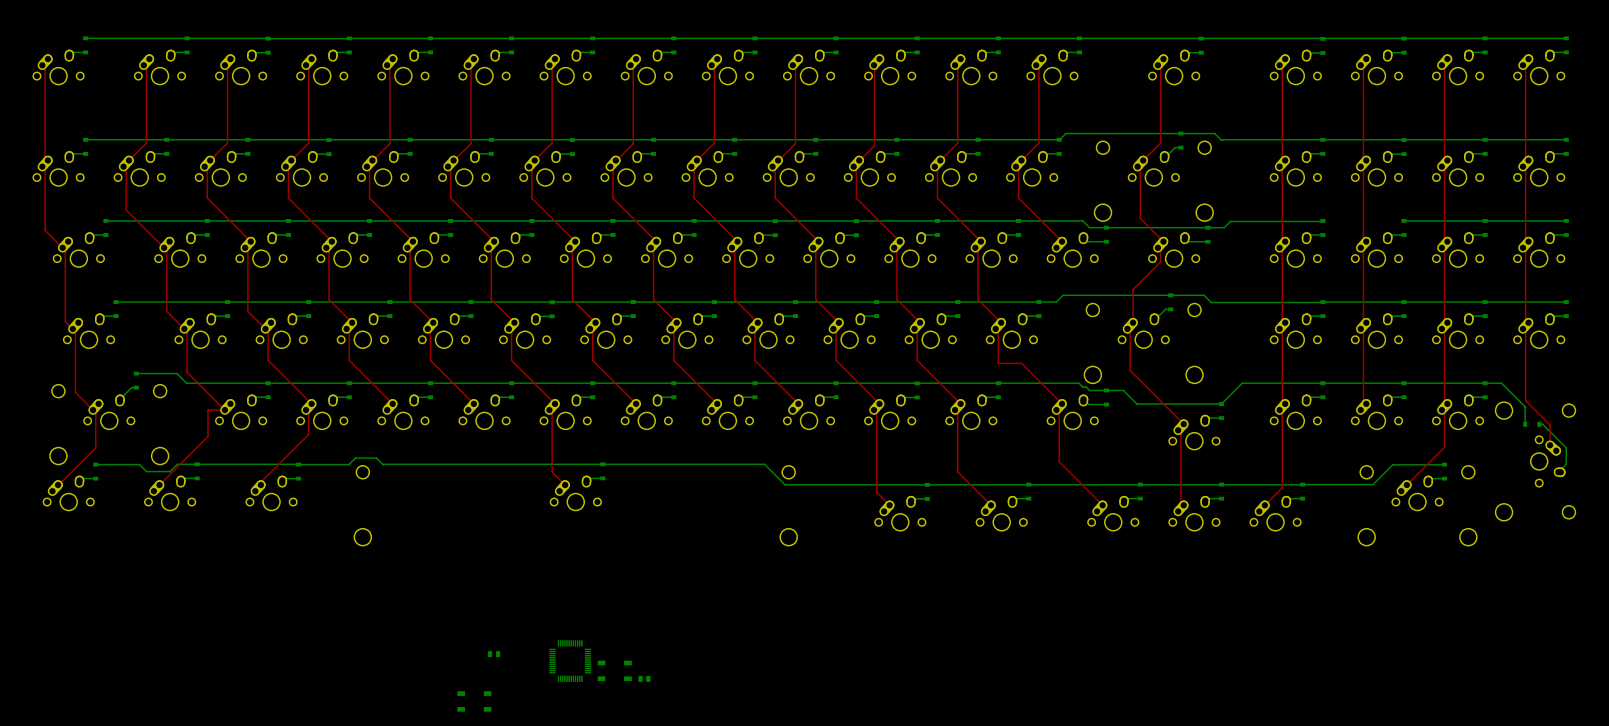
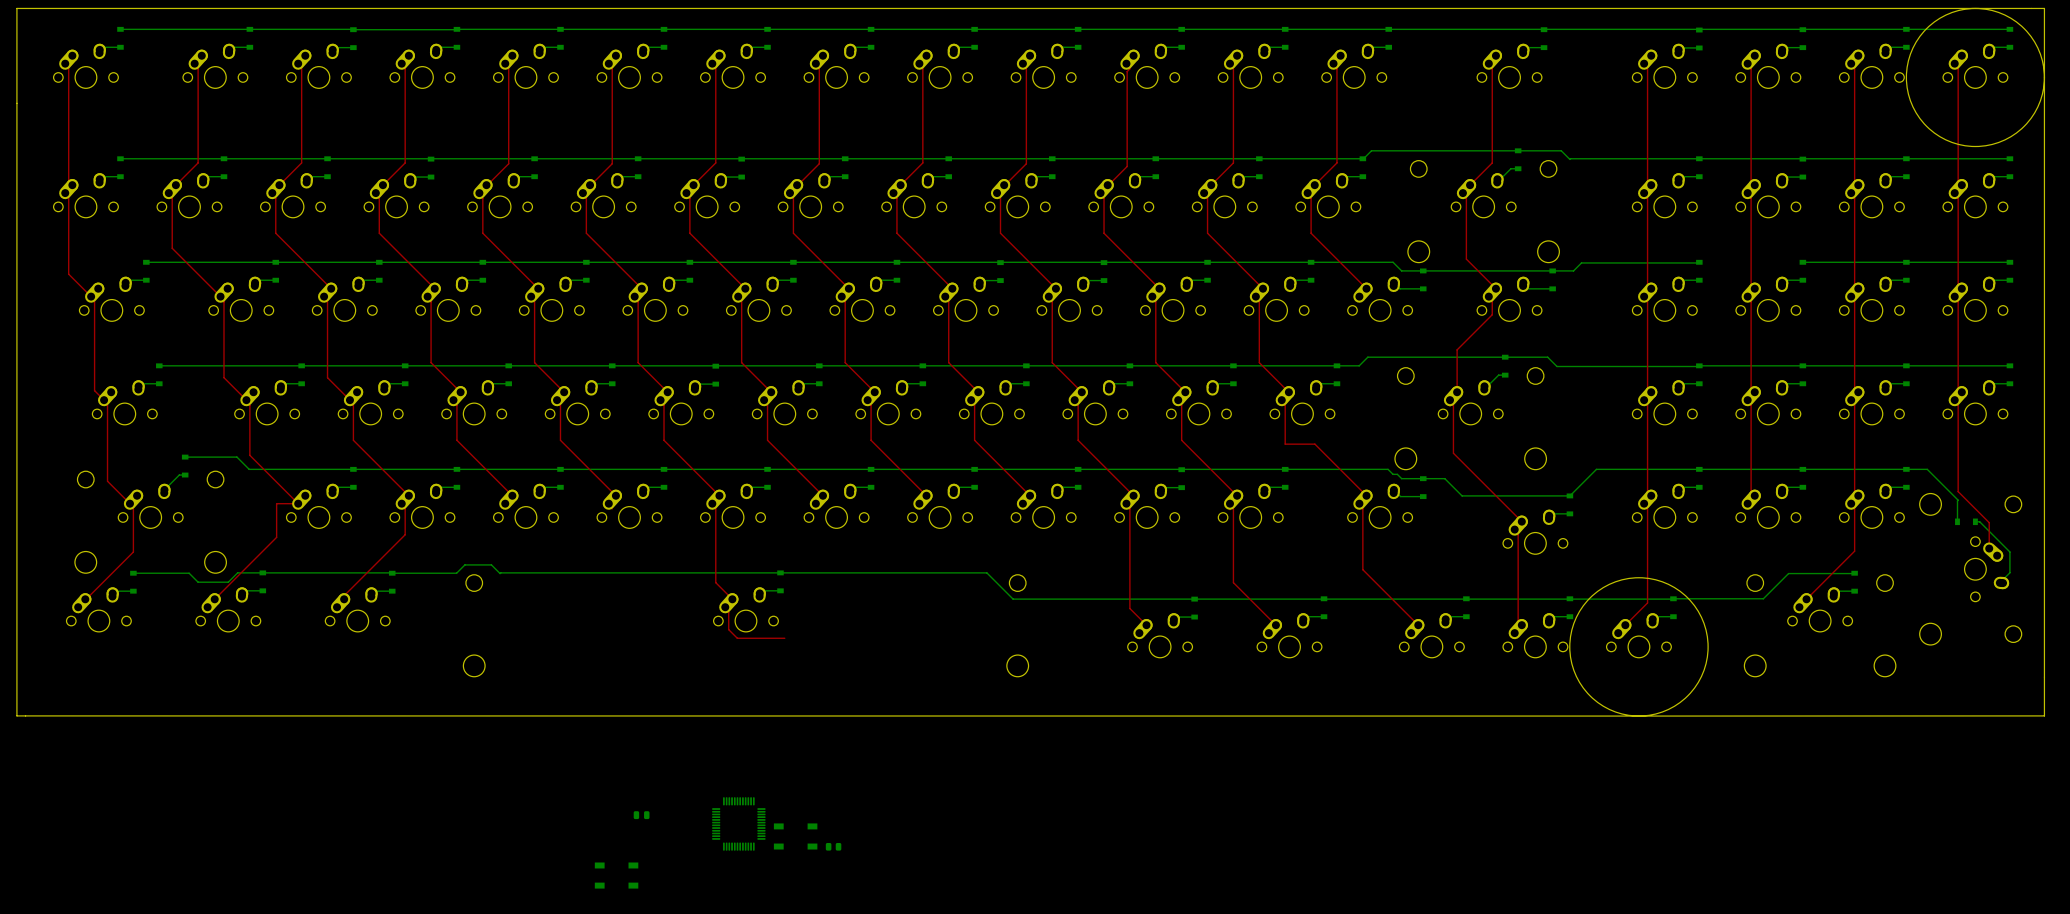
round board edge: none -> [1906, 8, 2045, 147]
board edge: none -> (16, 8) (16, 715) (2044, 715) (2044, 8) (16, 8)
round board edge: none -> [1569, 577, 1709, 717]
top track: none -> (725, 607) (728, 612) (728, 629) (737, 638) (784, 638)

